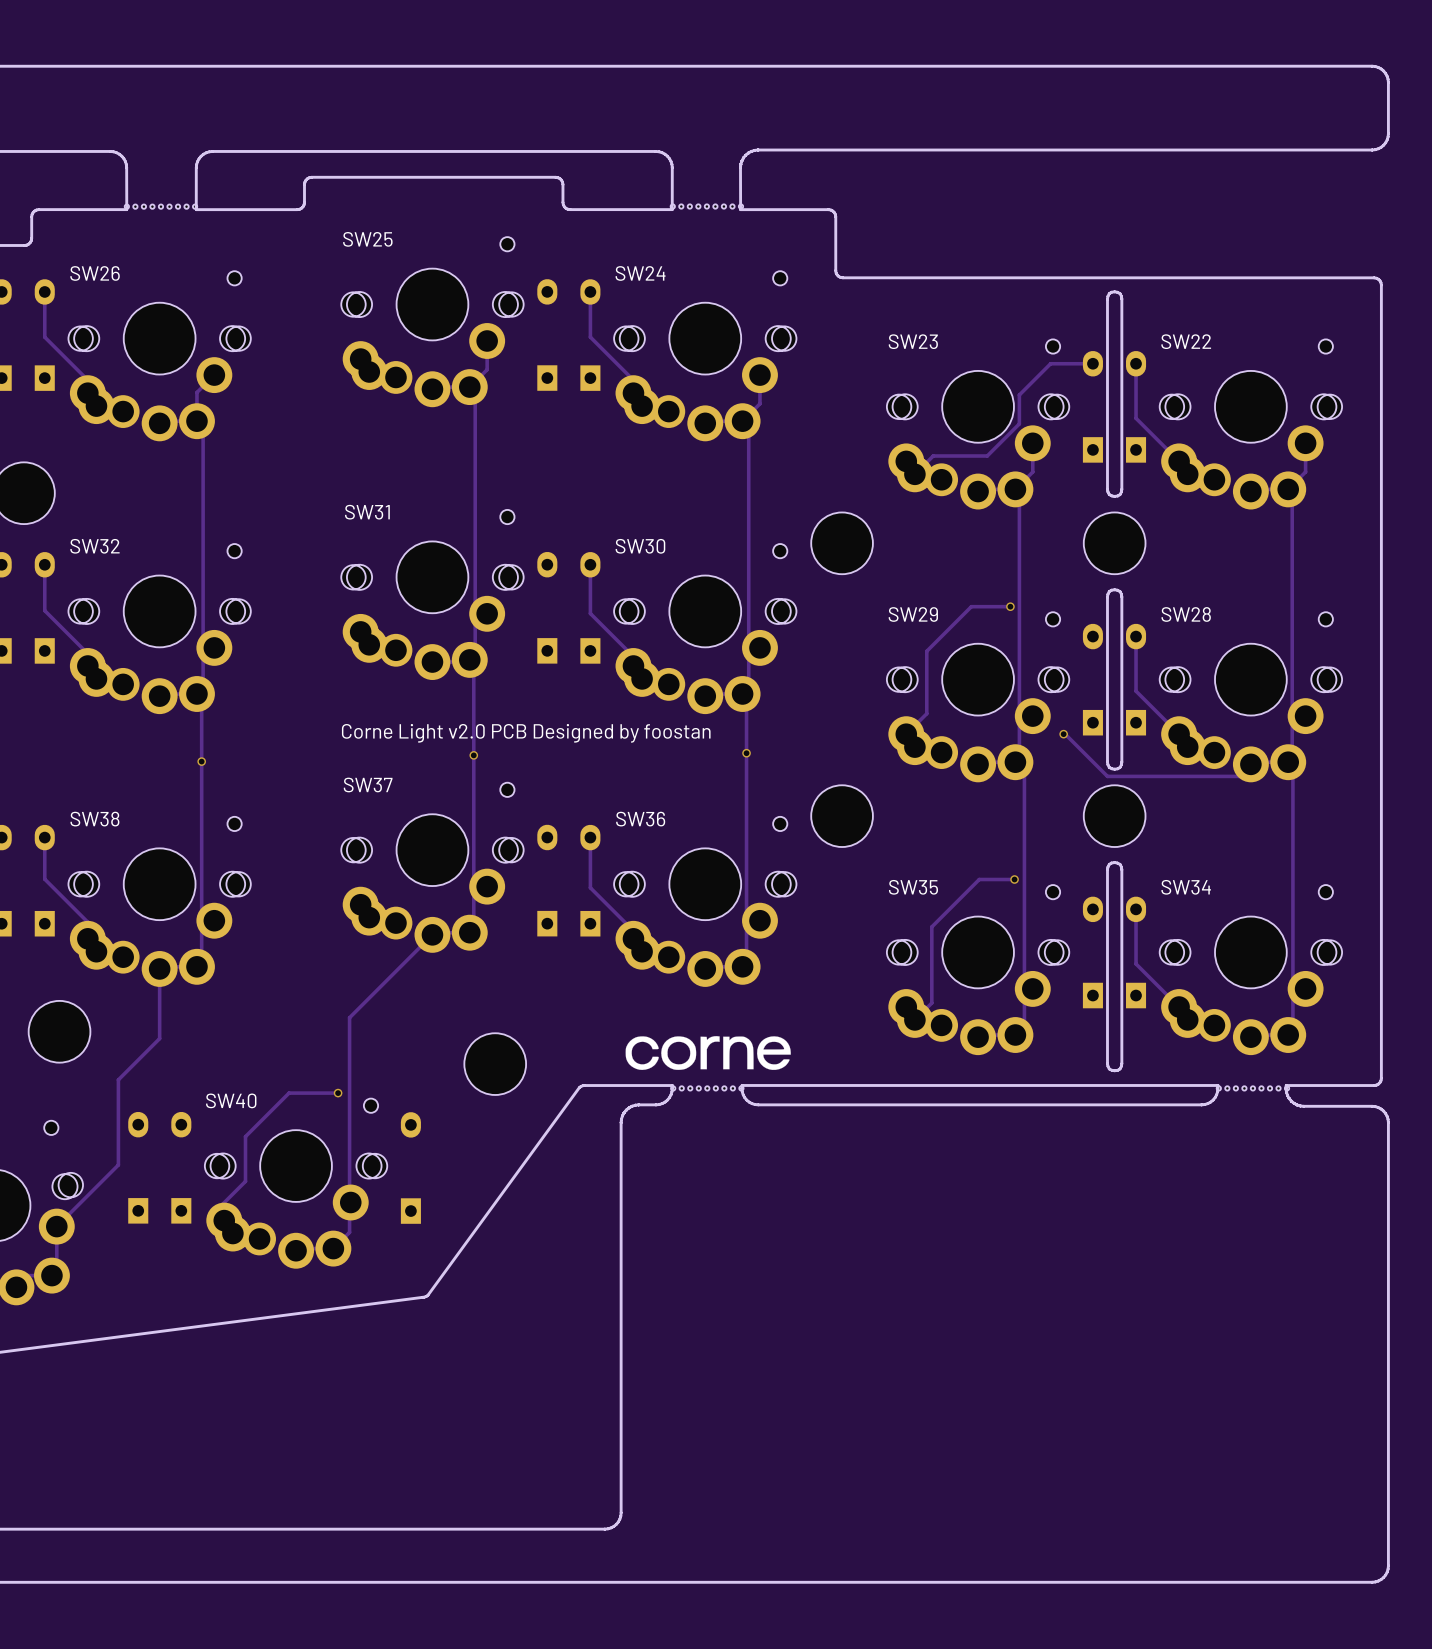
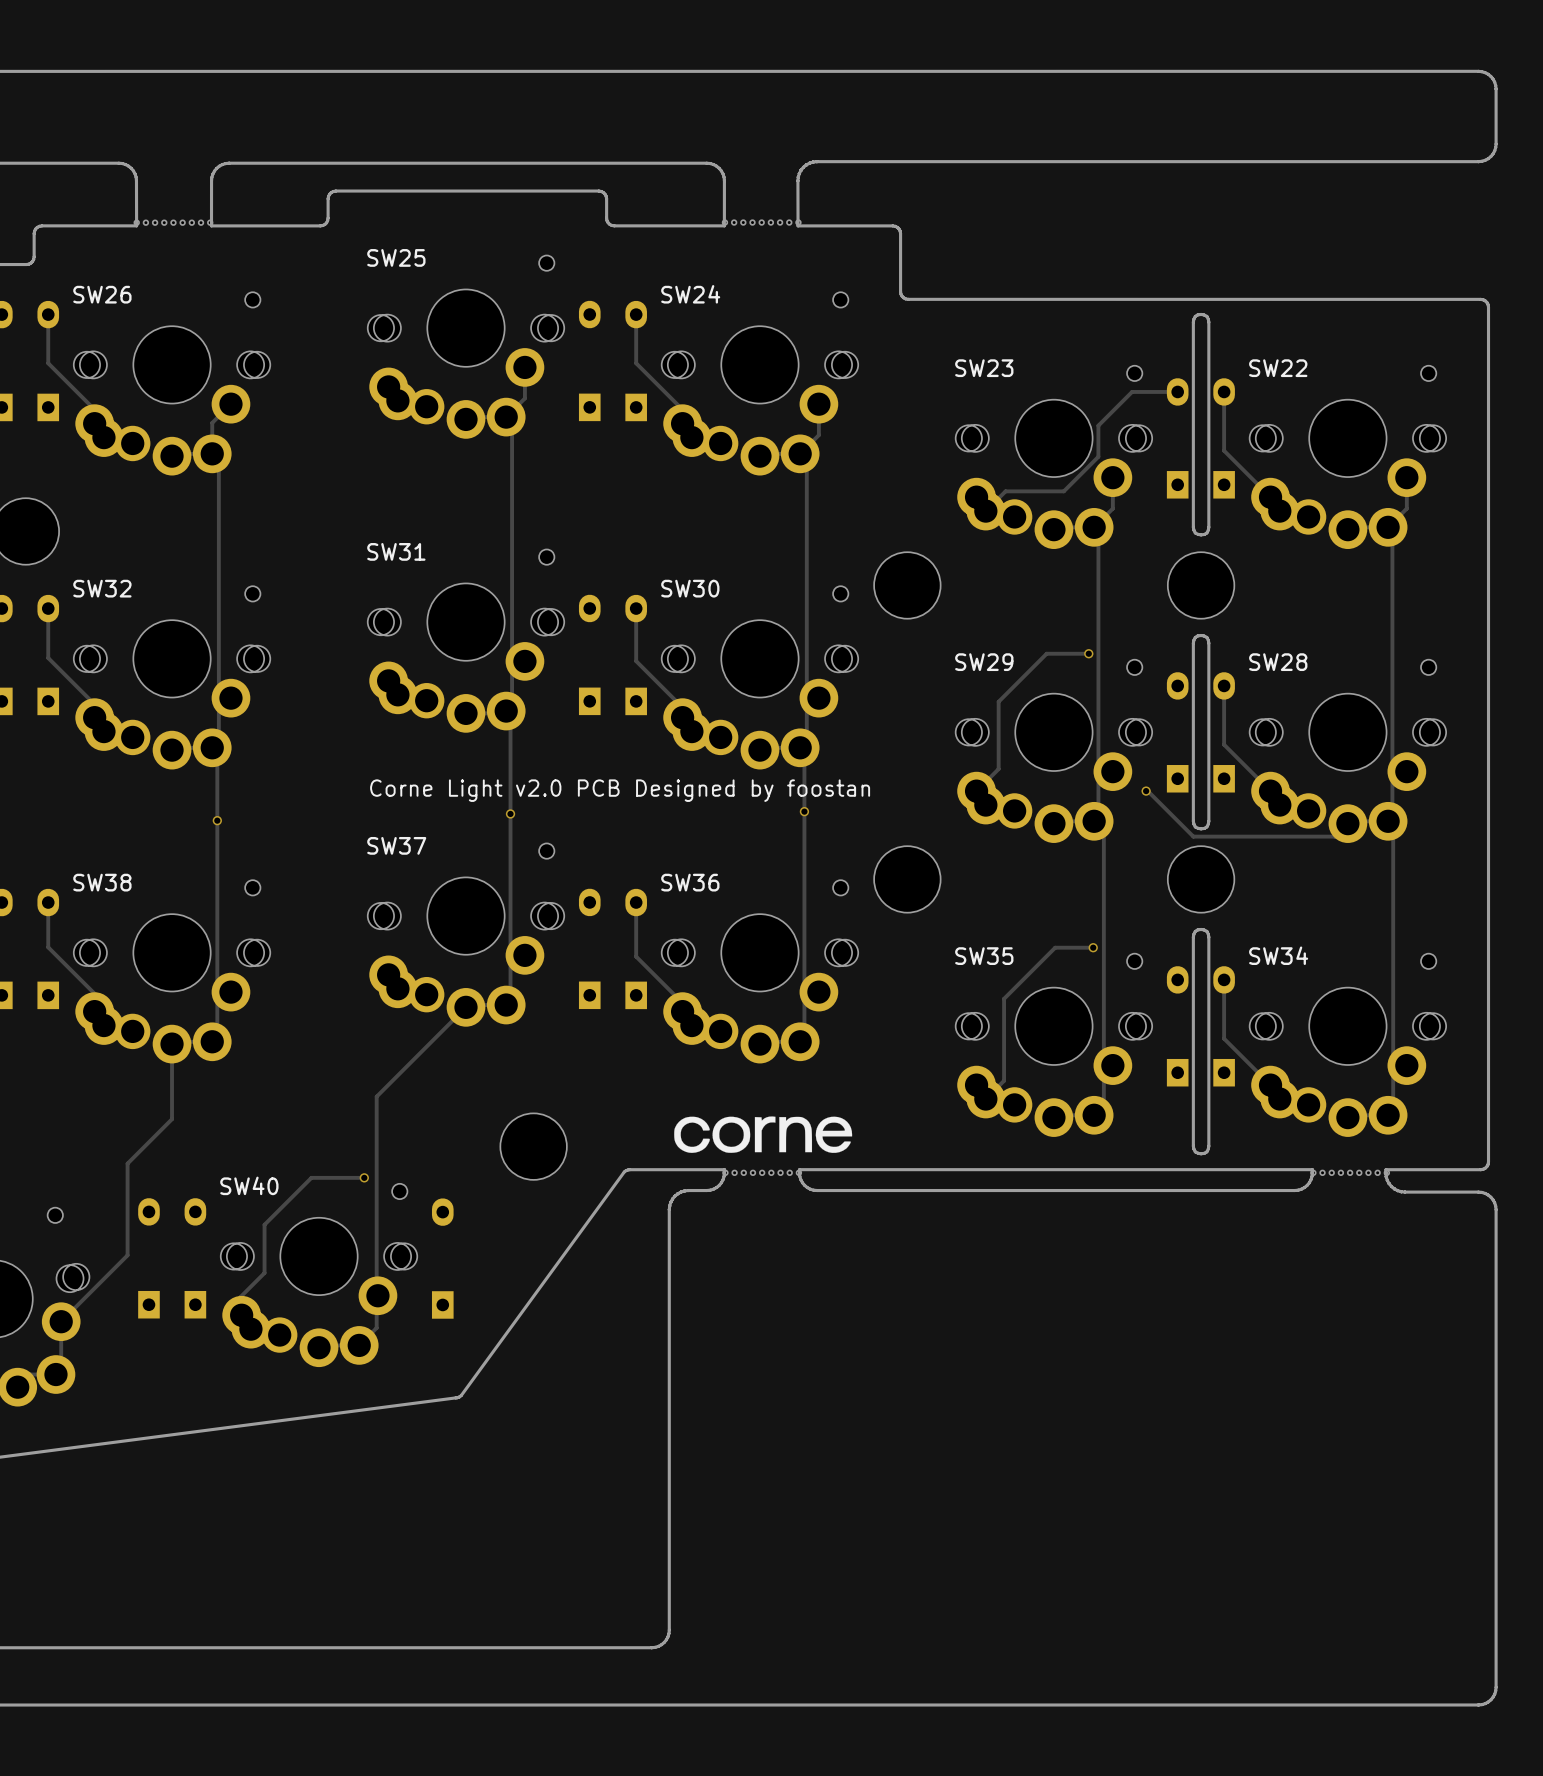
part: (59, 1031) -> none

